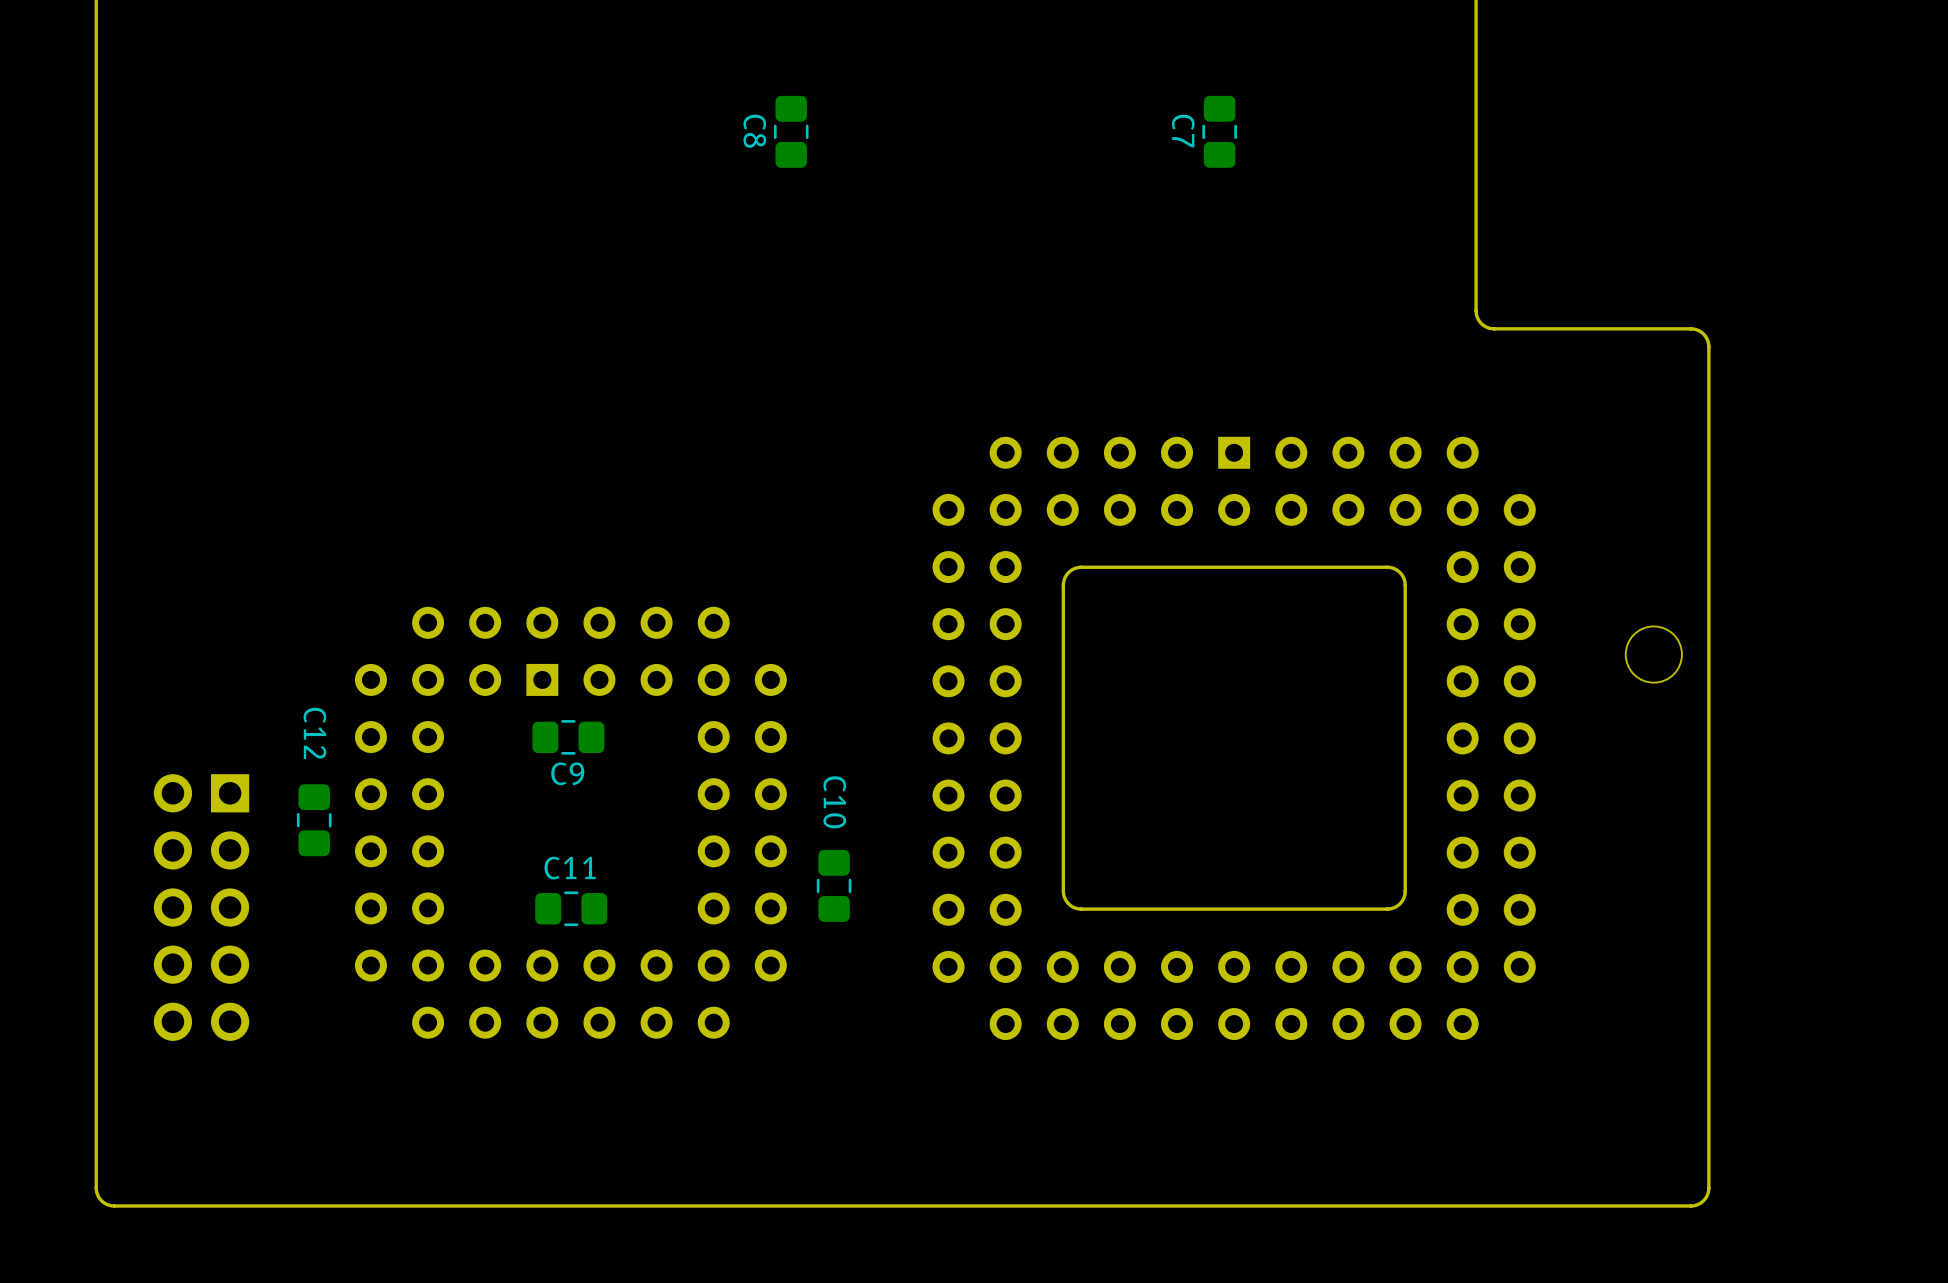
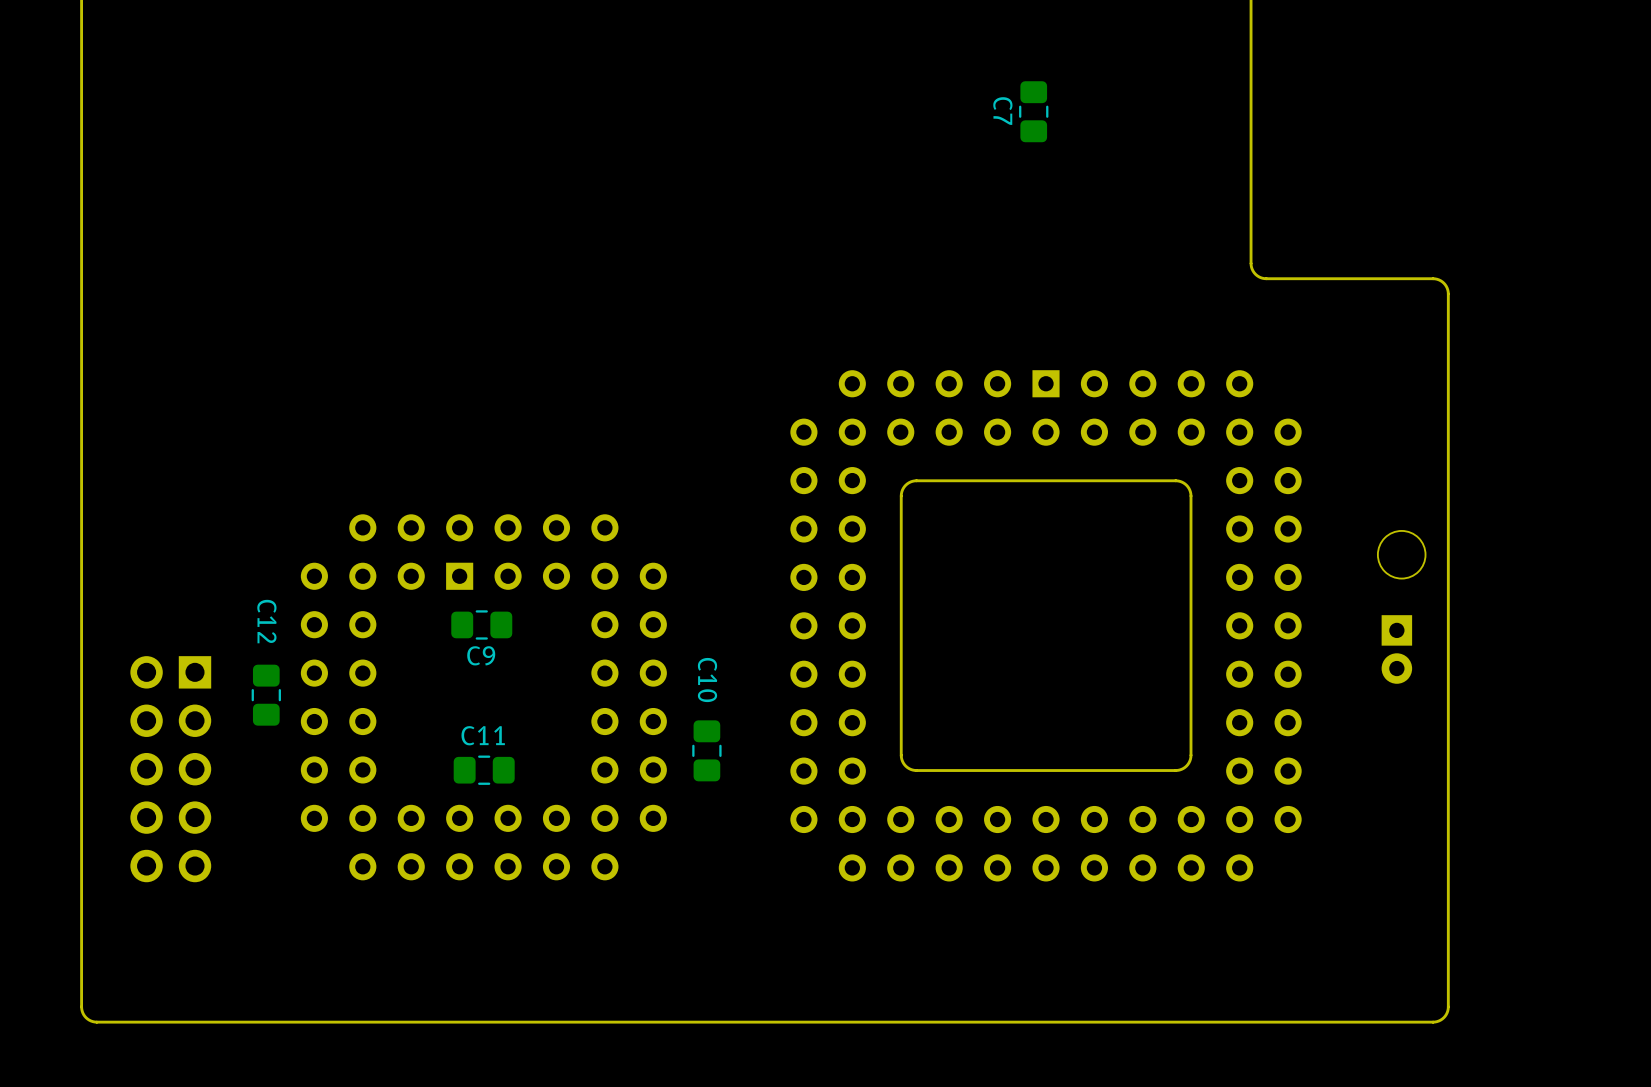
C8: (791, 131) -> none
part: none -> (1396, 649)

